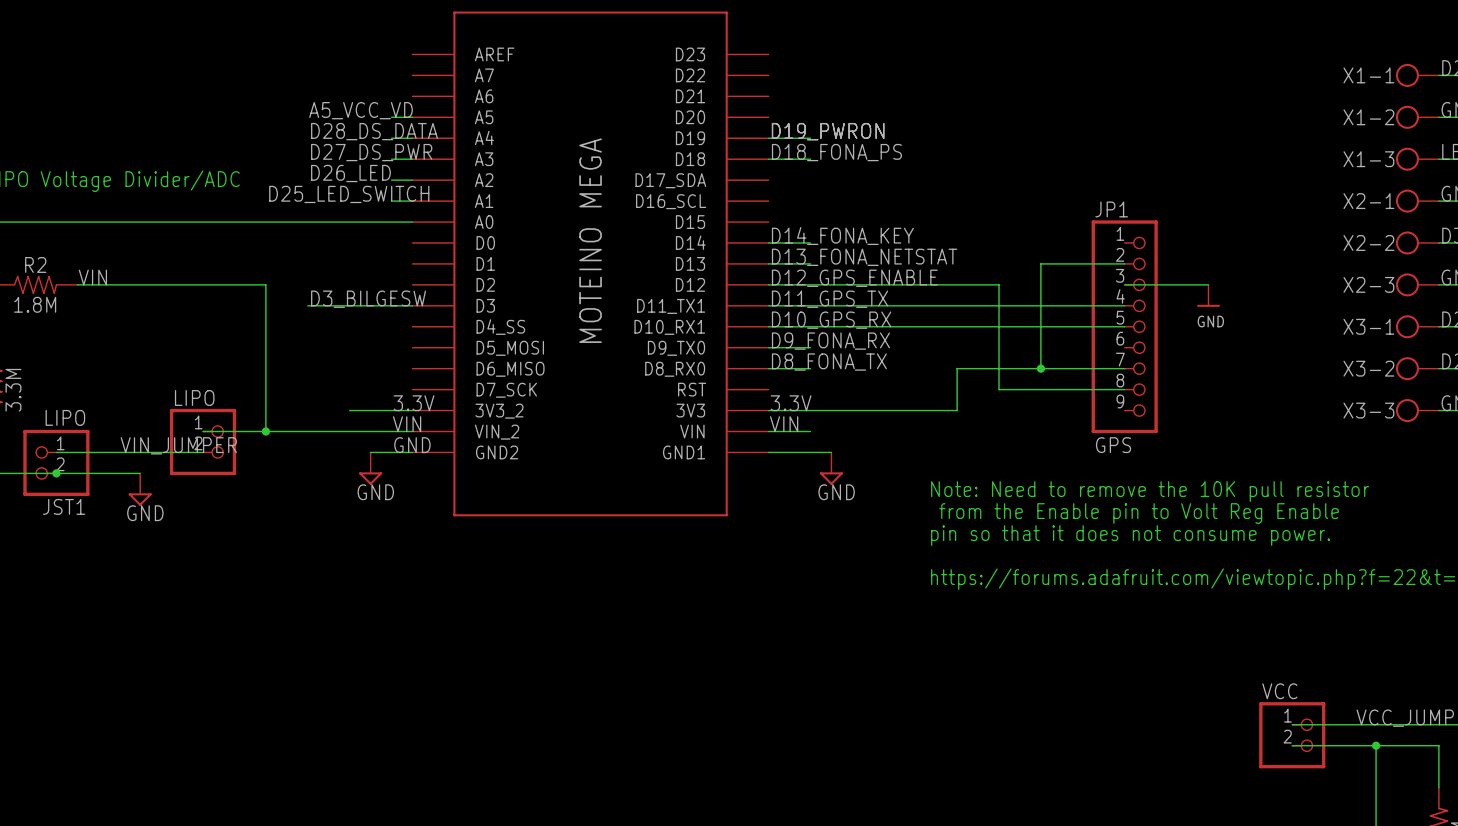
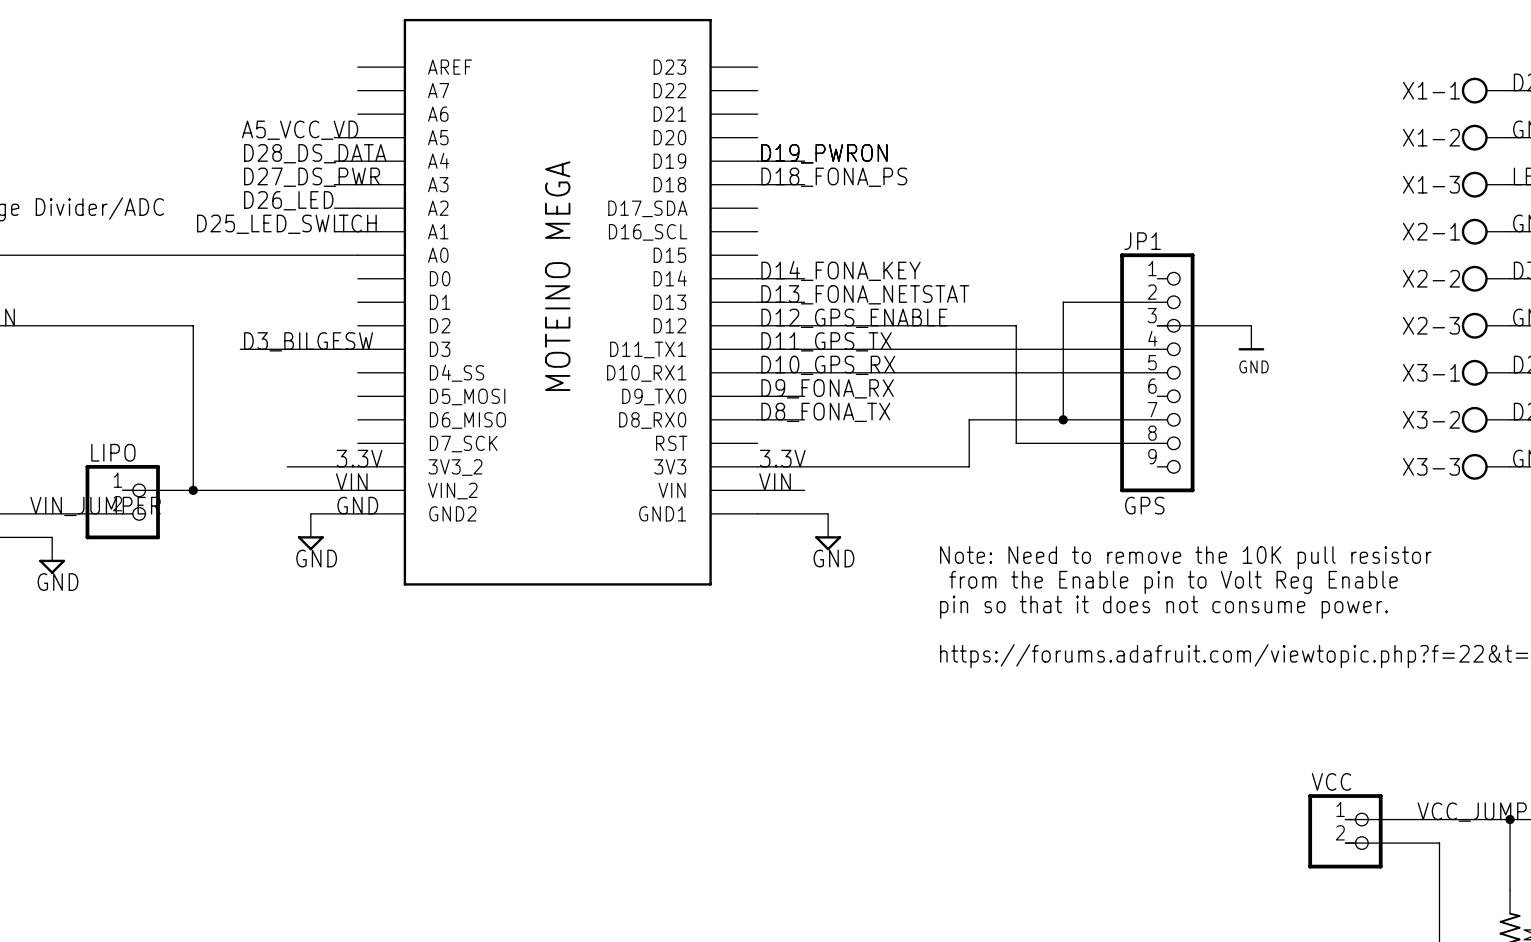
junction: none -> (1510, 819)
wire: (1376, 745) (1438, 745) -> (1510, 819) (1510, 843)
junction: (1376, 745) -> none

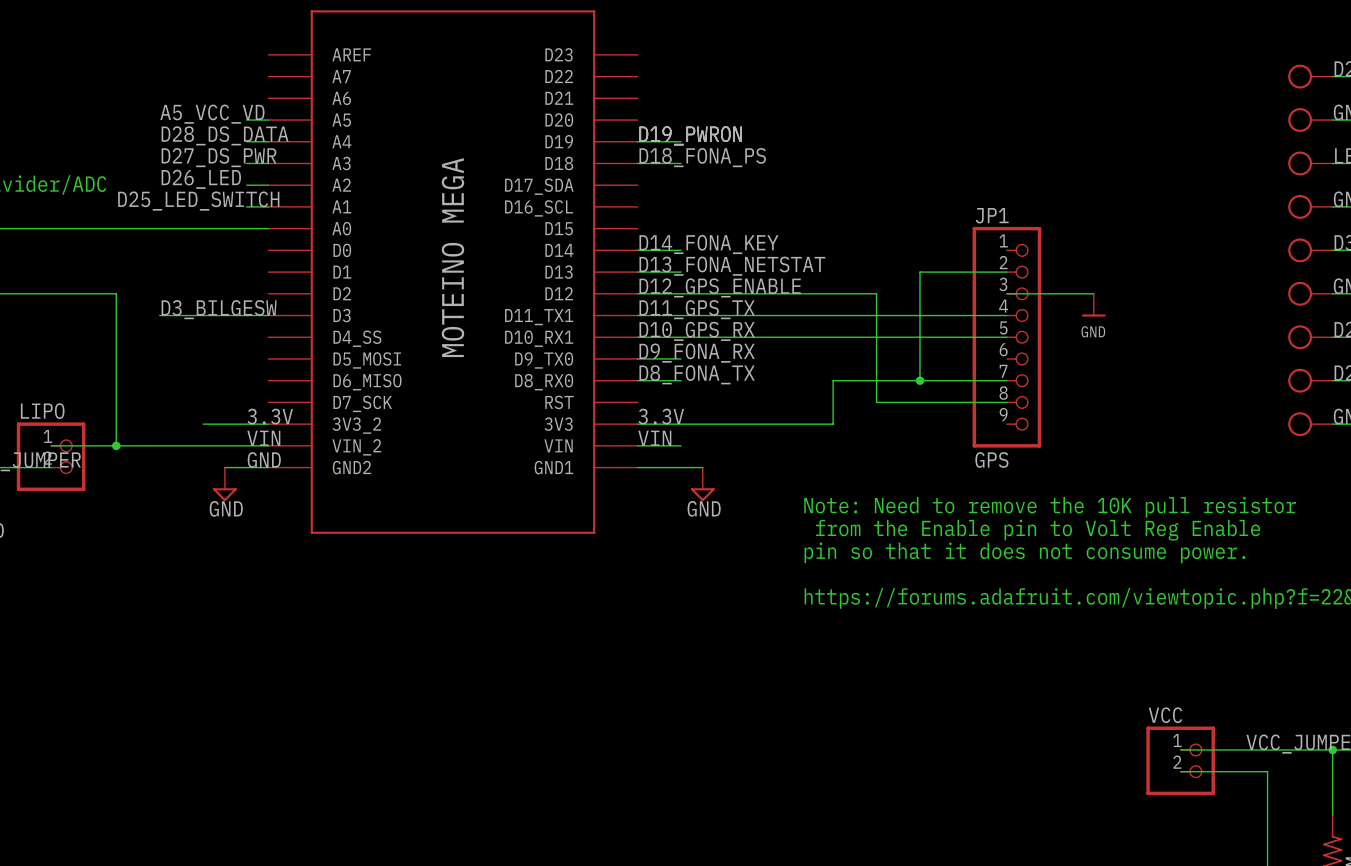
X1-1 name: X1-1 (1431, 90) -> none
X1-2 name: X1-2 (1431, 137) -> none
X1-3 name: X1-3 (1431, 184) -> none
X2-1 name: X2-1 (1431, 231) -> none
X2-2 name: X2-2 (1431, 278) -> none
X2-3 name: X2-3 (1431, 325) -> none
X3-1 name: X3-1 (1431, 372) -> none
X3-2 name: X3-2 (1431, 419) -> none
X3-3 name: X3-3 (1431, 466) -> none

